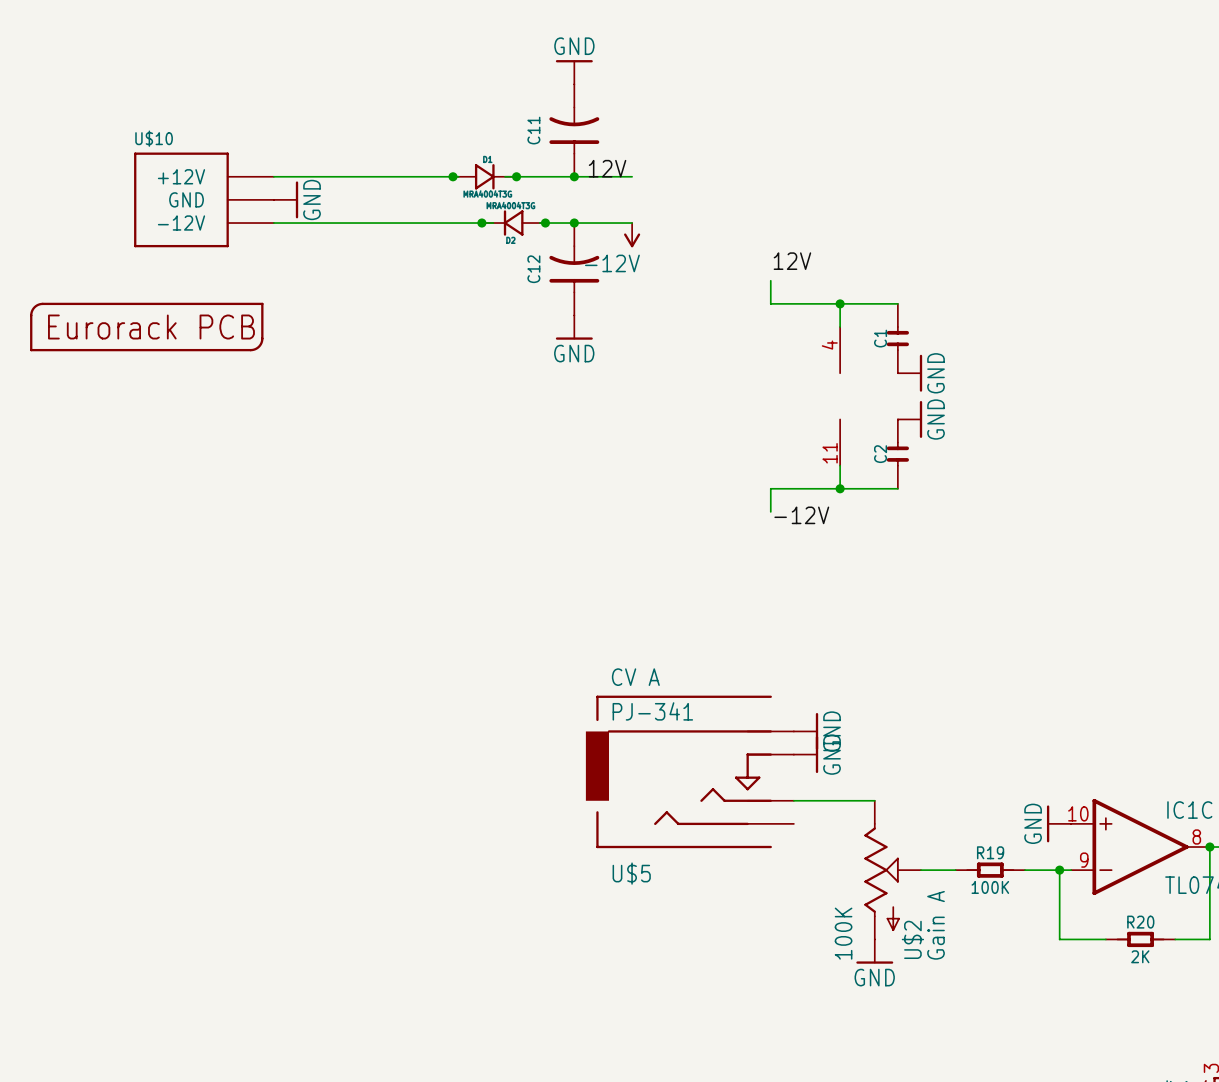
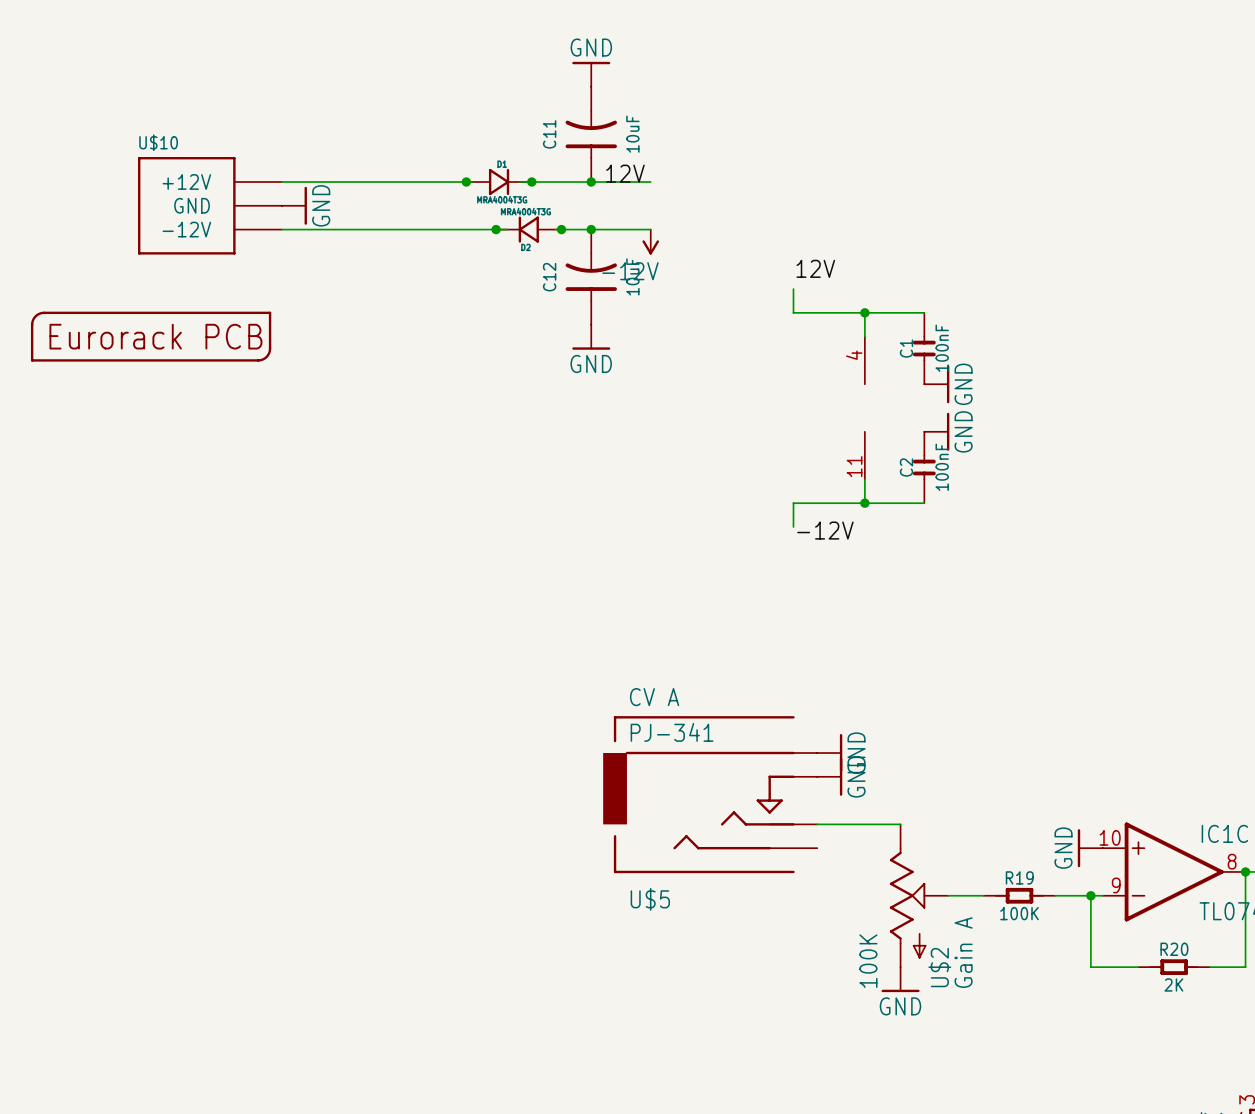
C11 value: none -> 10uF (632, 134)
C12 value: none -> 10uF (632, 276)
C1 value: none -> 100nF (942, 348)
C2 value: none -> 100nF (942, 467)

